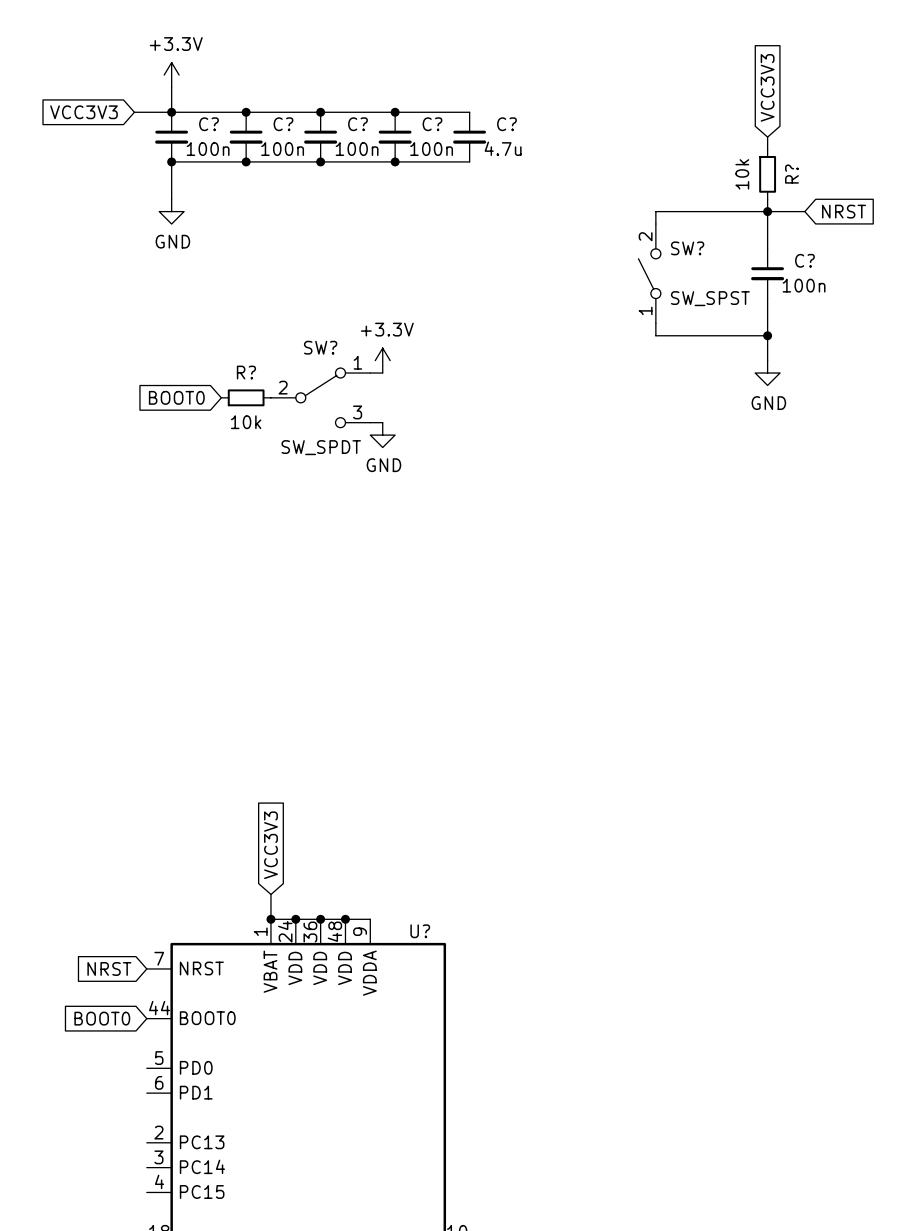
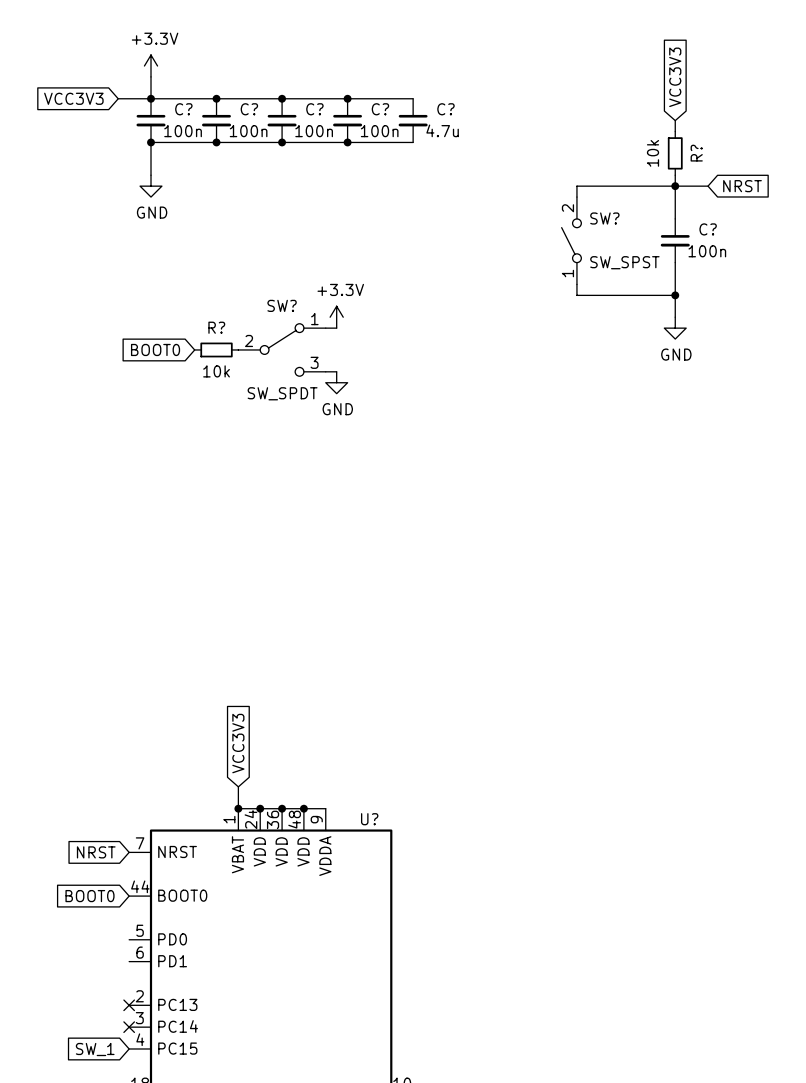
no-connect mark: none -> (129, 1005)
no-connect mark: none -> (129, 1027)
global label: none -> SW_1 (95, 1049)

